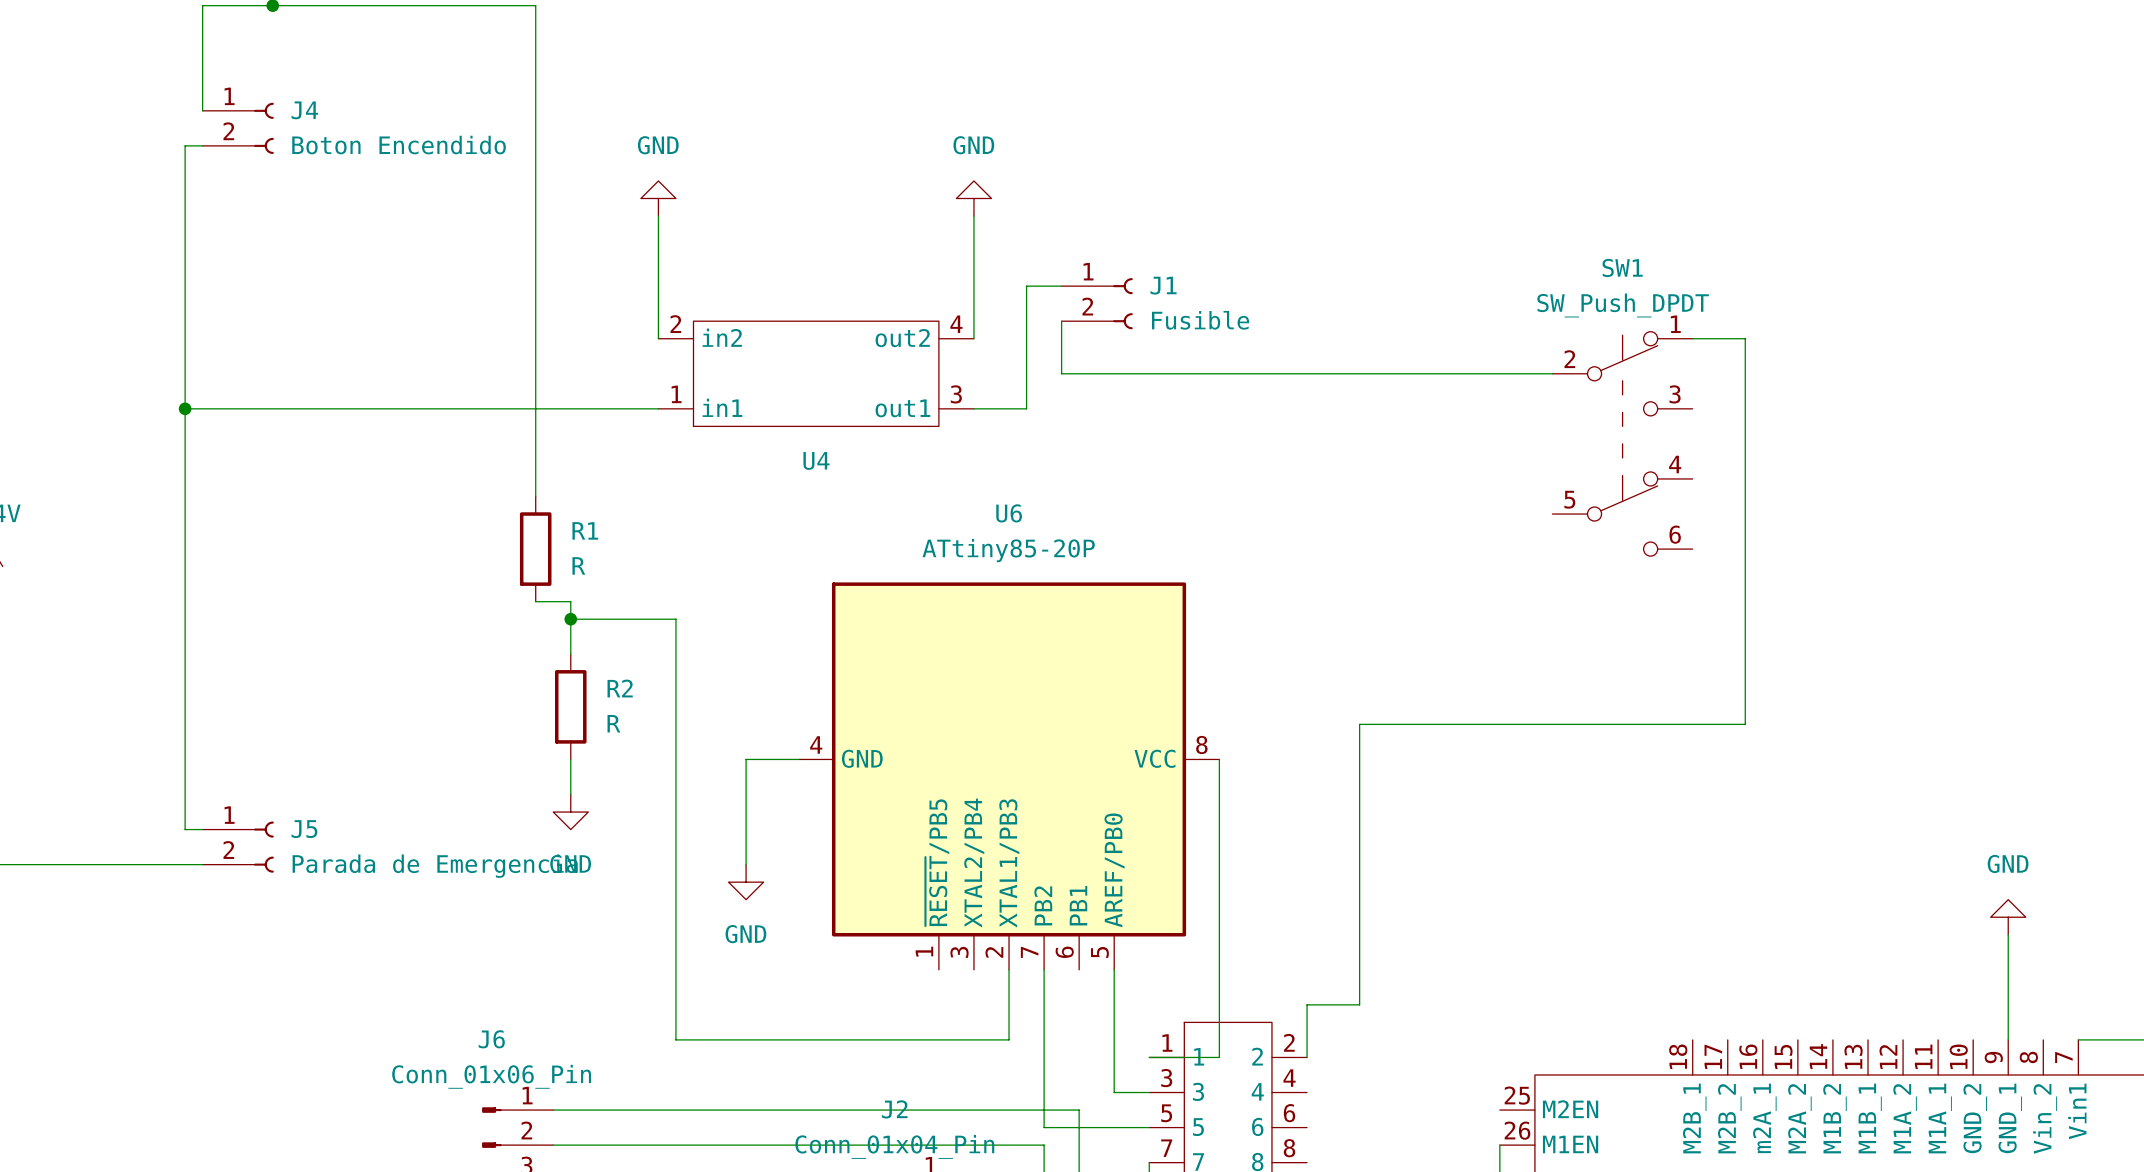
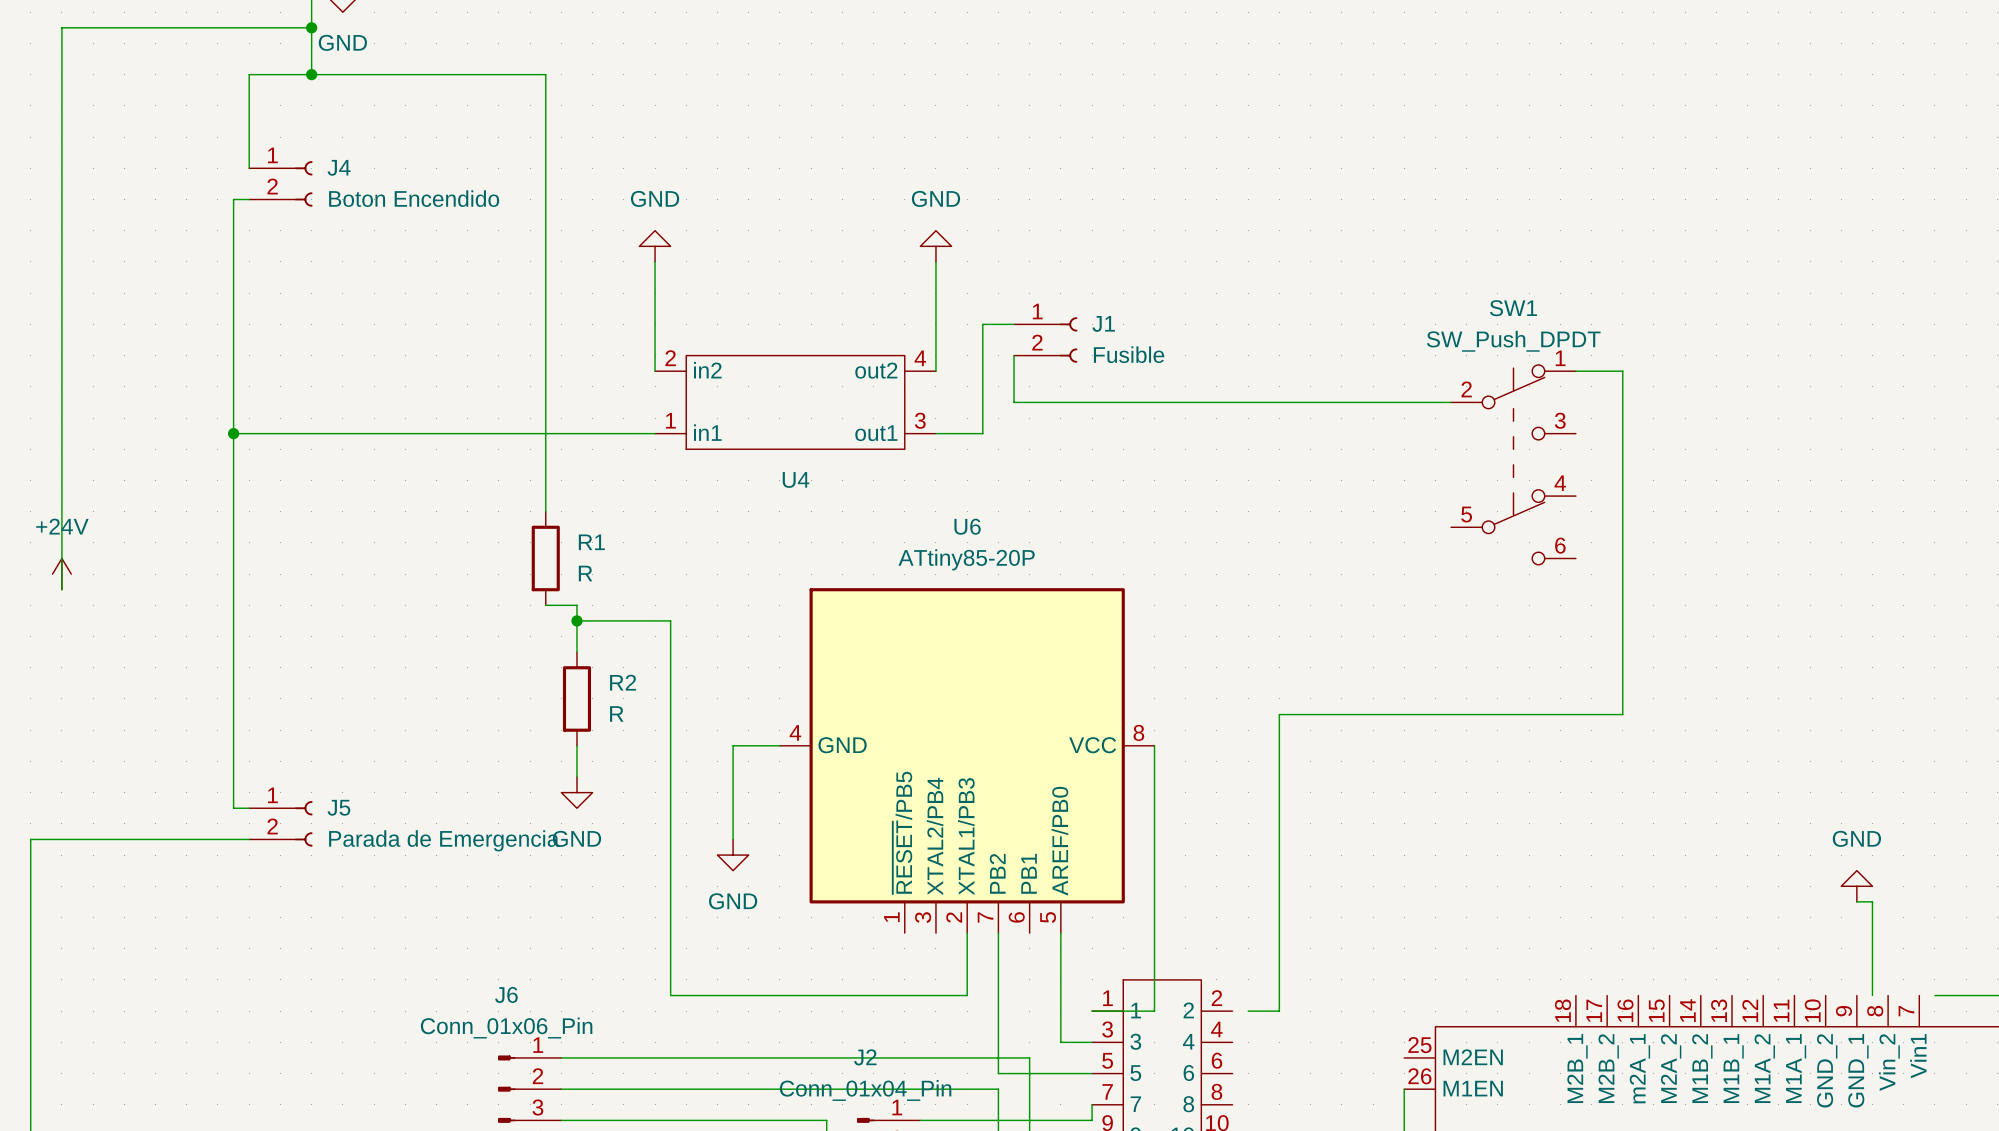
wire: (2008, 934) (2008, 1039) -> (1856, 901) (1872, 901) (1872, 995)
wire: (1359, 1004) (1307, 1004) (1307, 1057) -> (1279, 964) (1279, 1011) (1248, 1011)
wire: (2078, 1039) (2095, 1039) -> none

